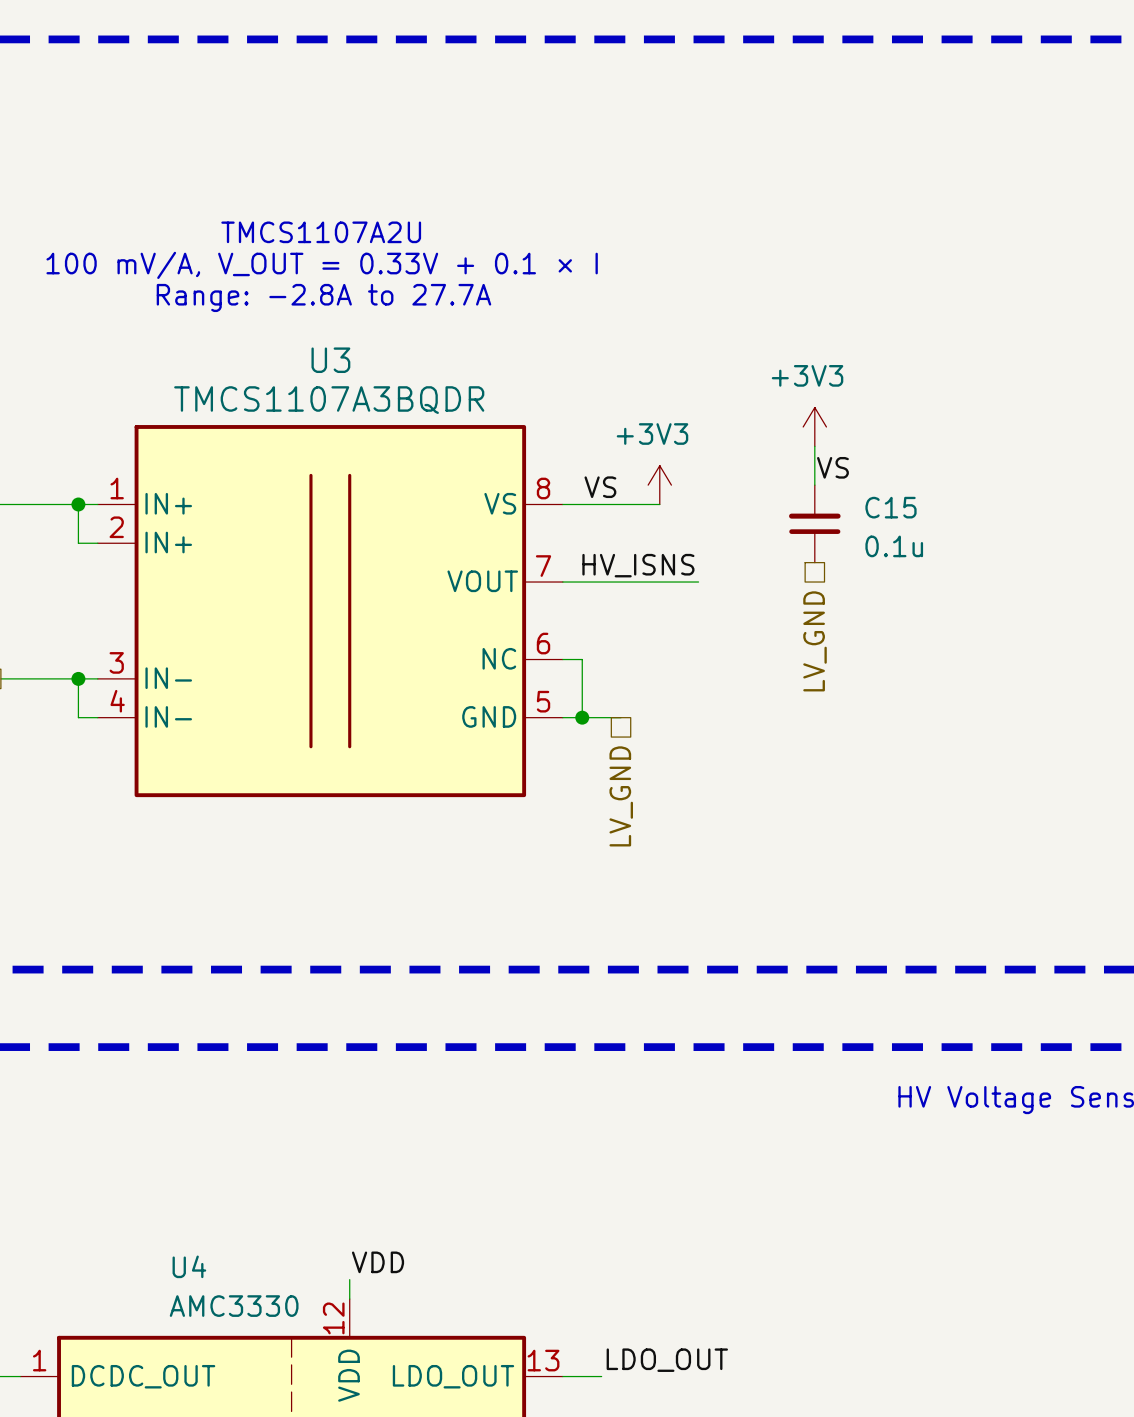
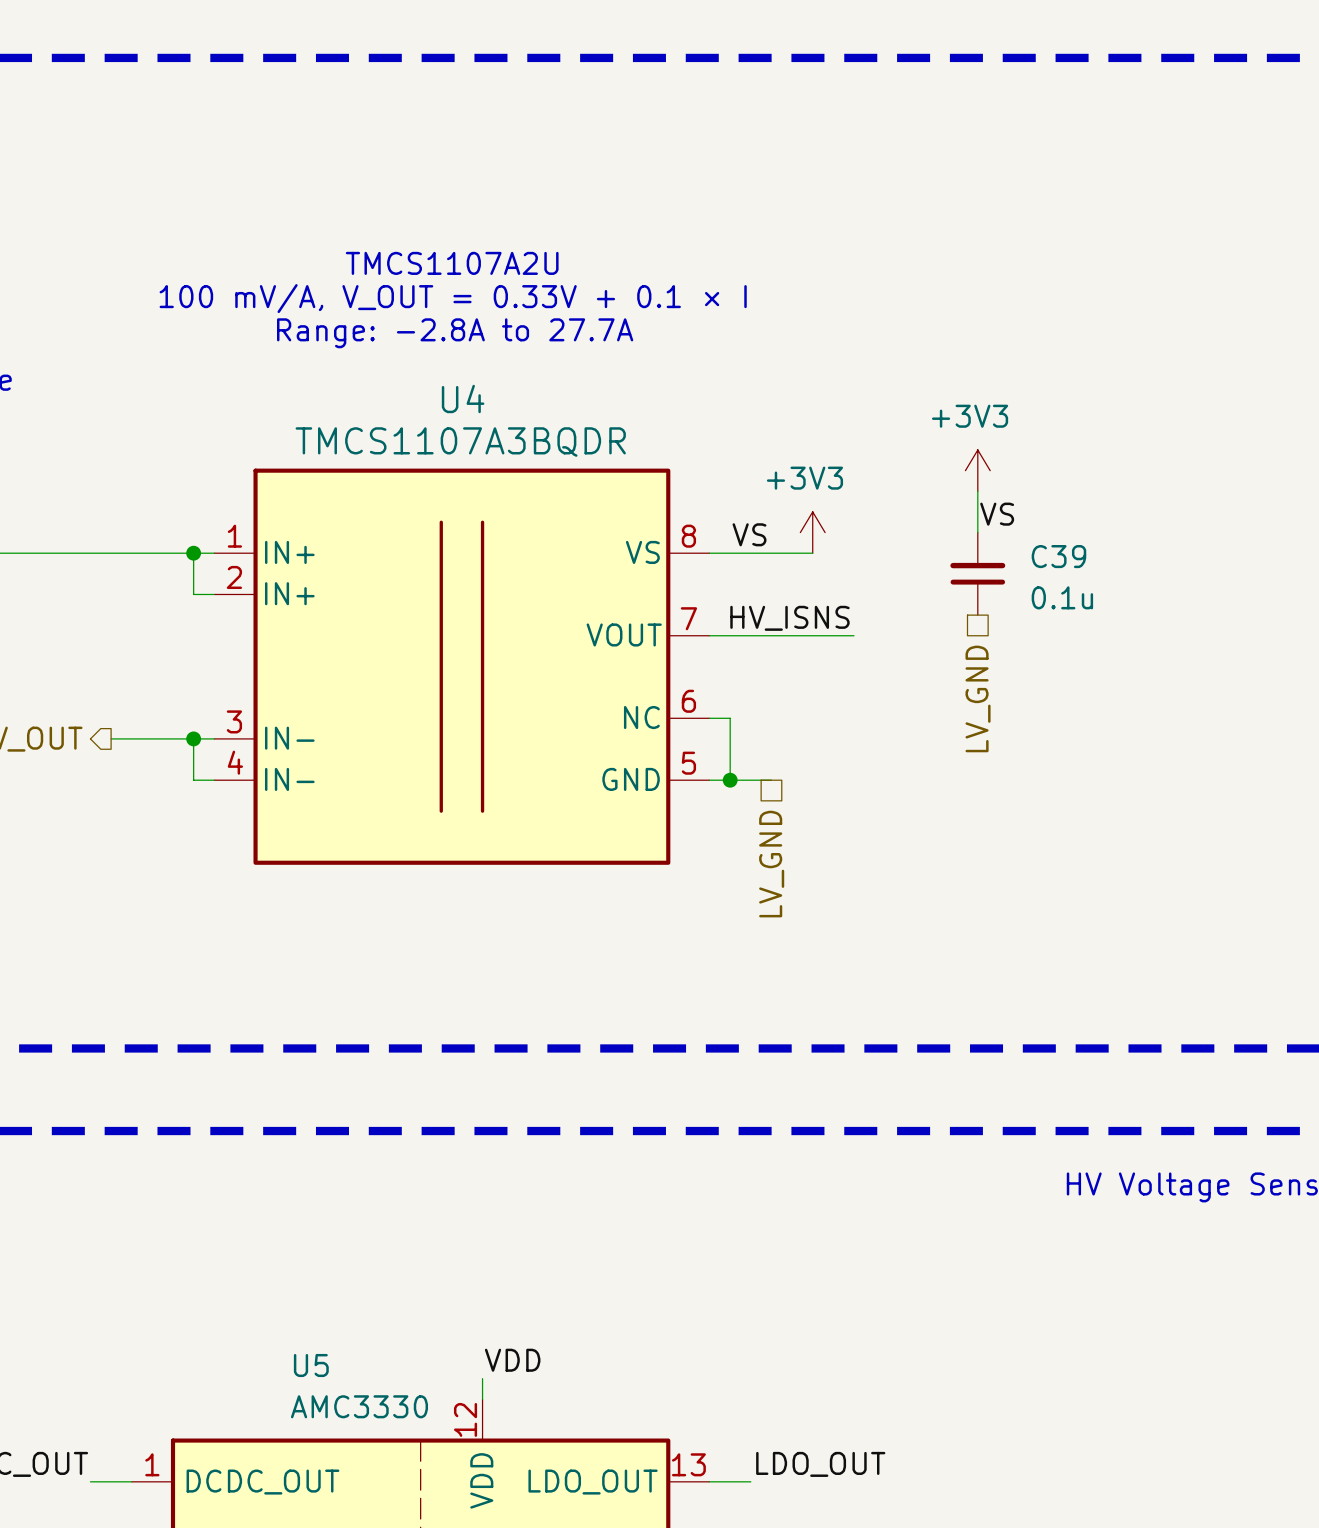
U3 name: U3 (330, 360) -> U4 (463, 398)
C15 name: C15 (891, 507) -> C39 (1058, 556)
U4 name: U4 (189, 1266) -> U5 (311, 1365)

